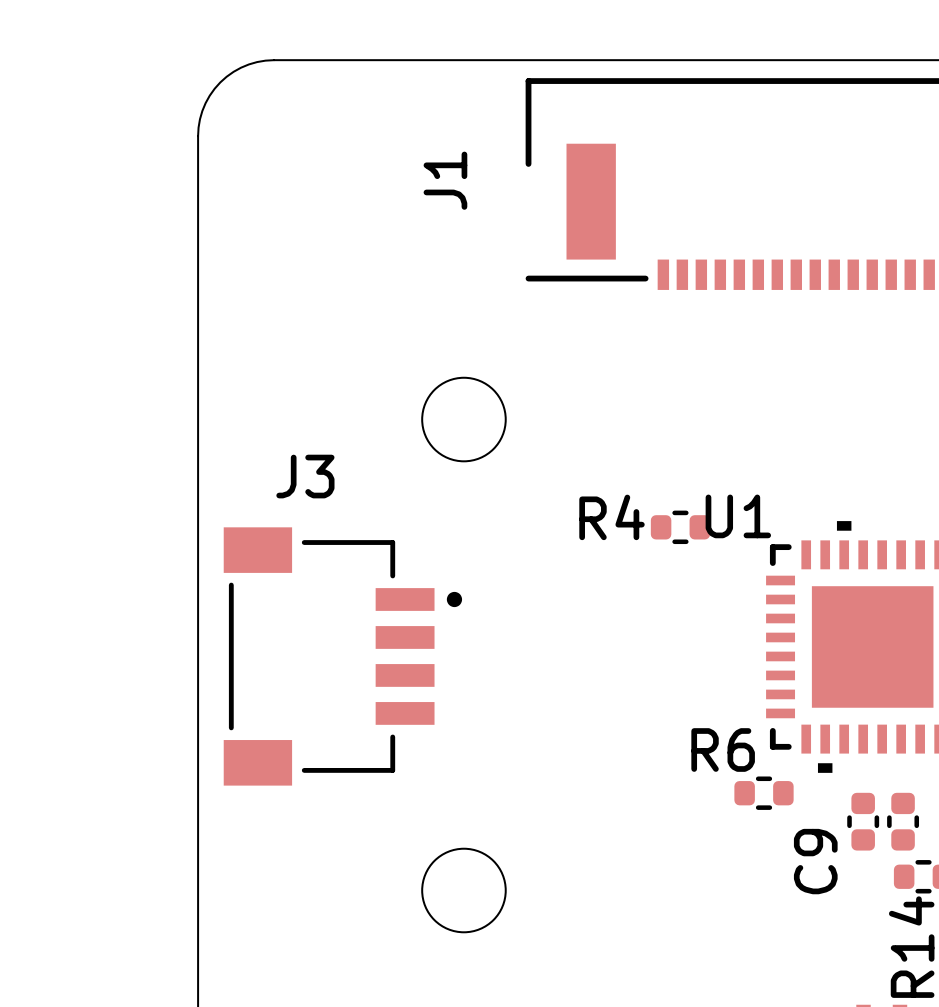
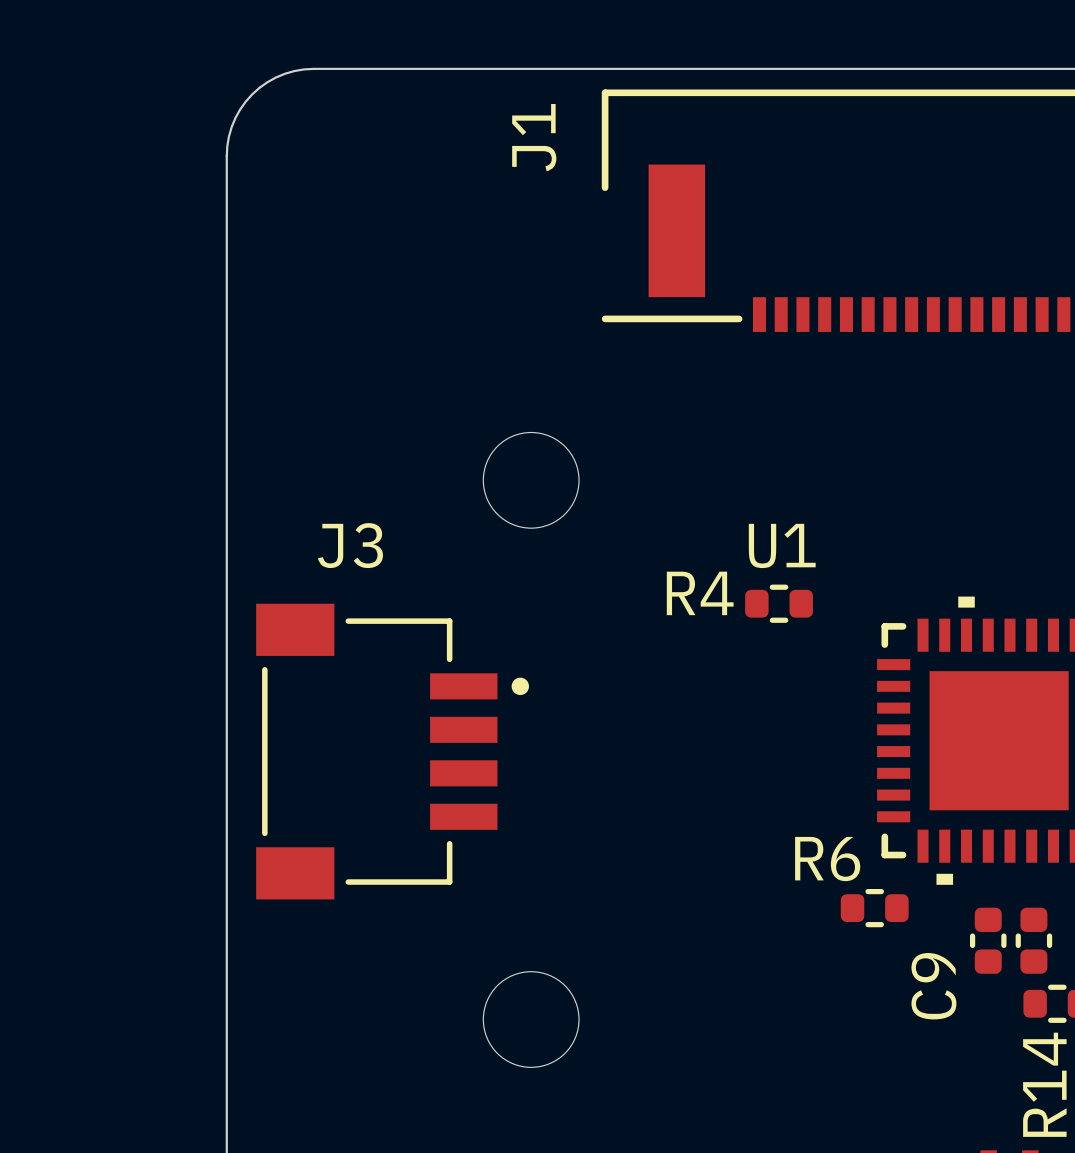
J1 name position: J1 (445, 180) -> J1 (534, 137)
U1 name position: U1 (738, 516) -> U1 (782, 545)

